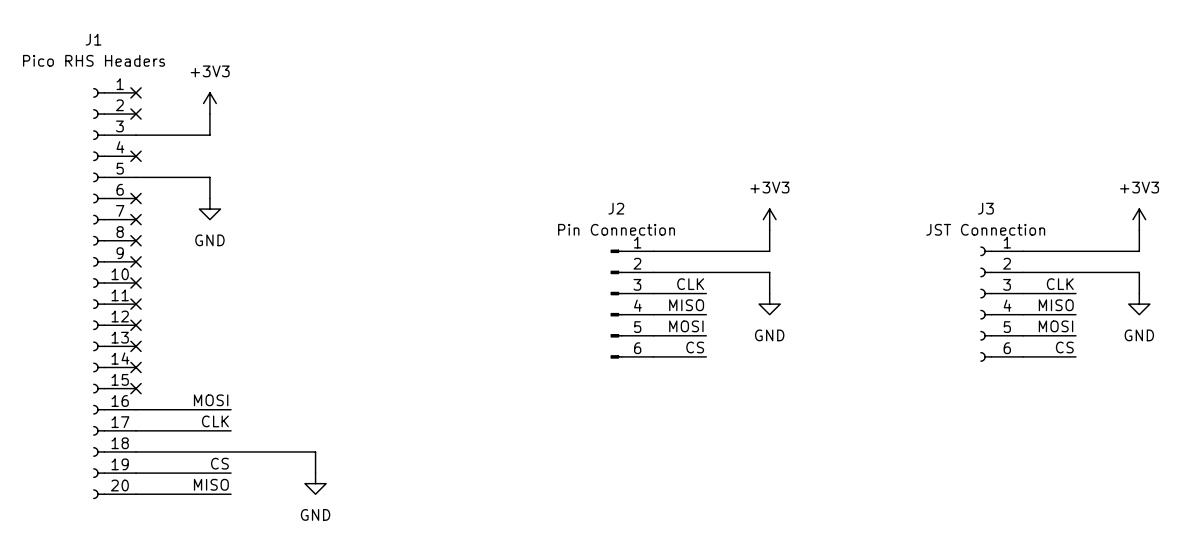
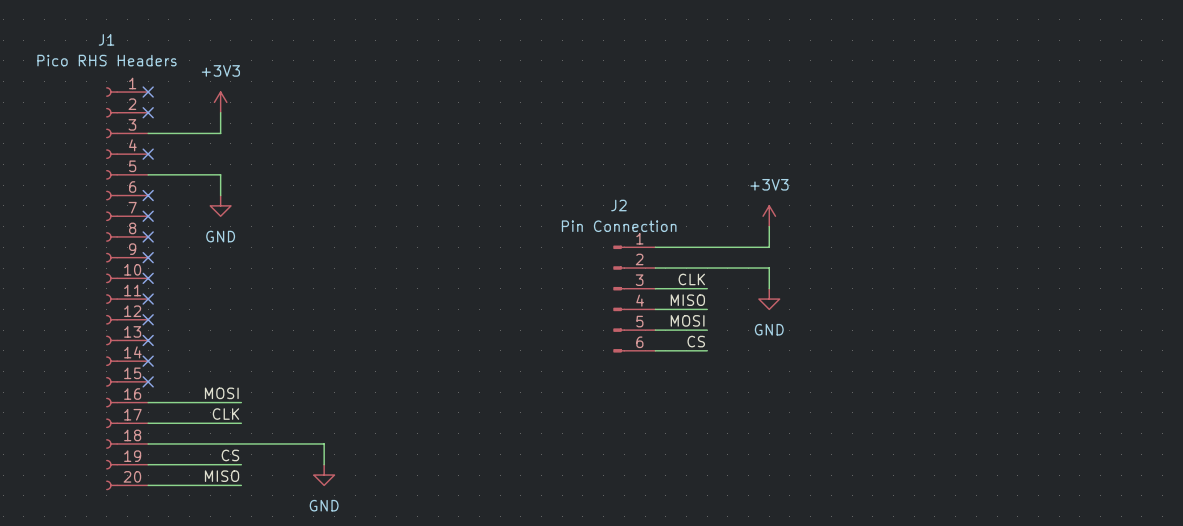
power symbol: +3V3 (1139, 219) -> none
wire: (1139, 230) (1139, 251) (1023, 251) -> none
wire: (1023, 272) (1139, 272) (1139, 293) -> none
label: CLK (1060, 284) -> none
wire: (1023, 293) (1075, 293) -> none
J3: JST Connection (1001, 304) -> none
power symbol: GND (1139, 304) -> none
label: MISO (1056, 305) -> none
wire: (1023, 314) (1075, 314) -> none
label: MOSI (1056, 326) -> none
wire: (1023, 335) (1075, 335) -> none
label: CS (1064, 347) -> none
wire: (1023, 356) (1075, 356) -> none

